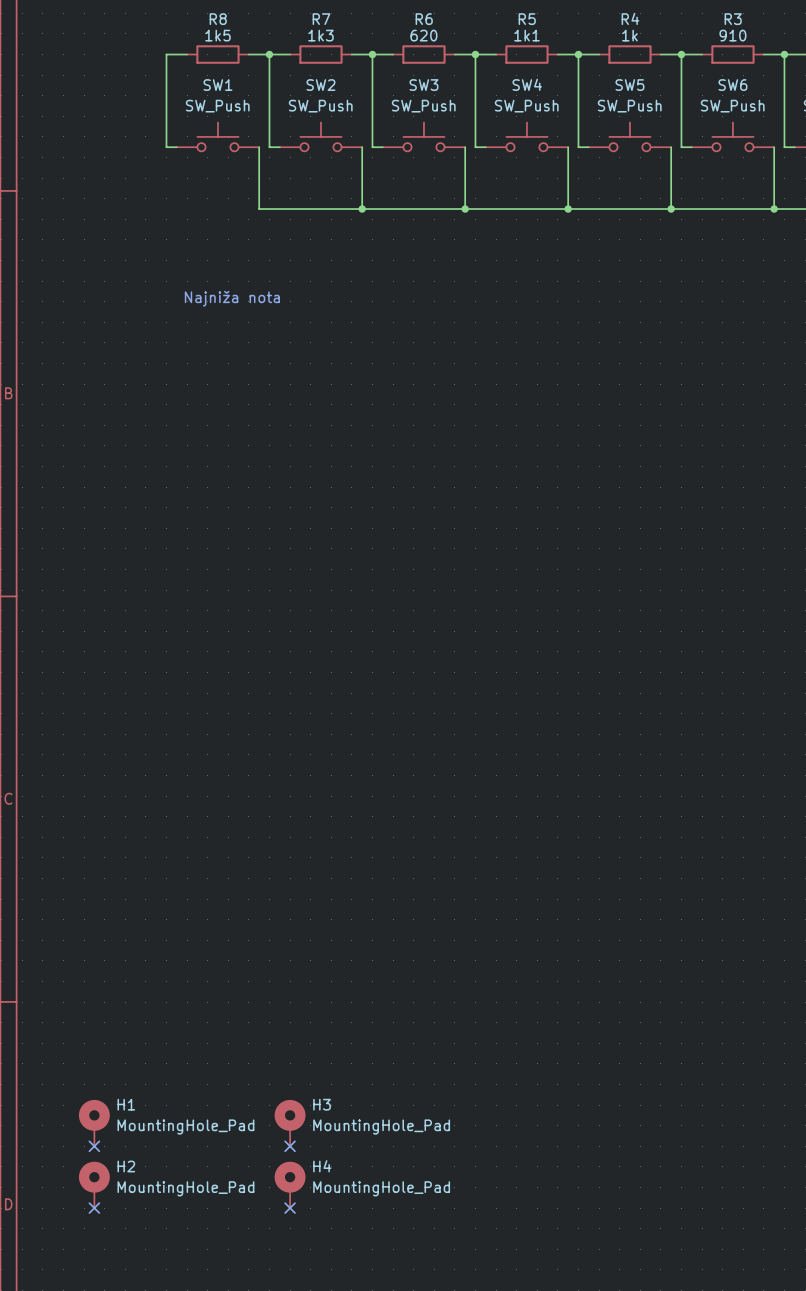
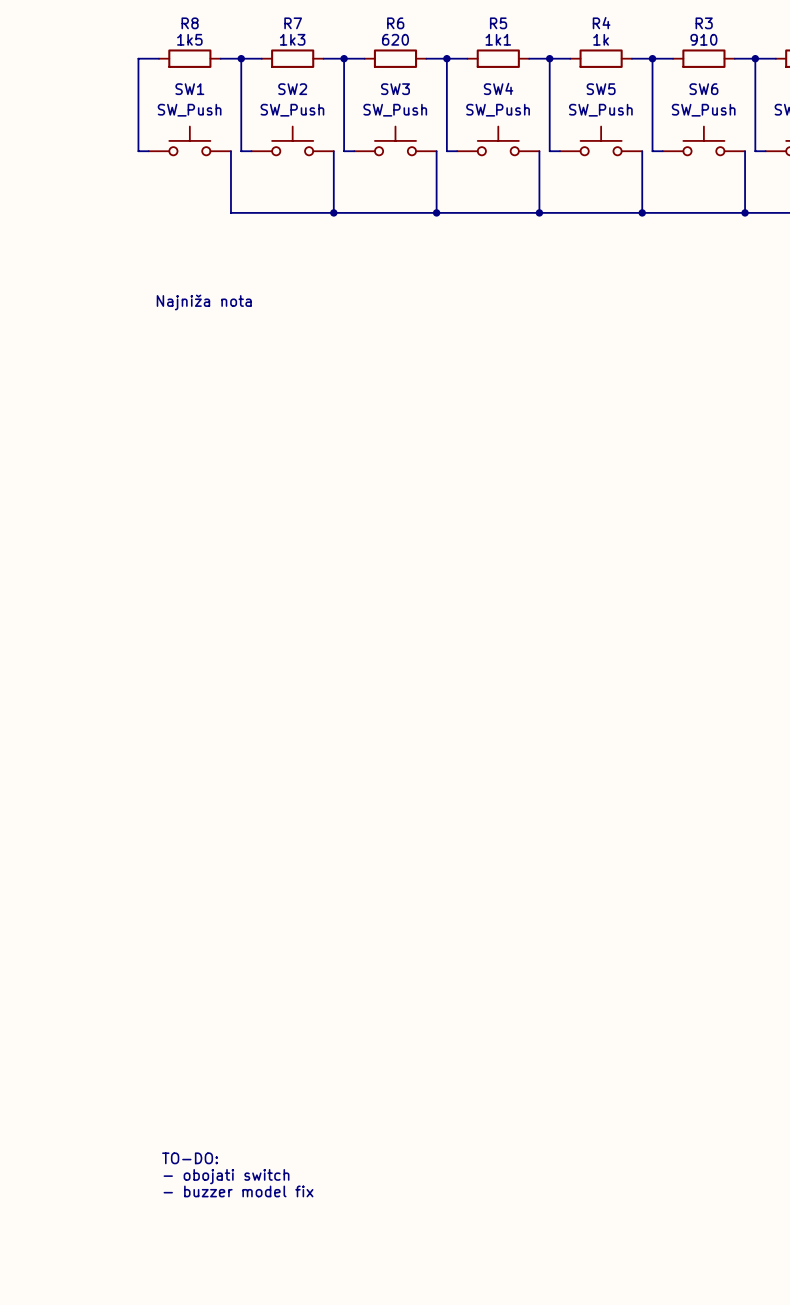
H1: MountingHole_Pad (94, 1123) -> none
H3: MountingHole_Pad (290, 1123) -> none
no-connect mark: (94, 1146) -> none
no-connect mark: (290, 1146) -> none
text: none -> TO-DO: (190, 1158)
text: none -> - obojati switch (226, 1176)
H2: MountingHole_Pad (94, 1184) -> none
H4: MountingHole_Pad (290, 1184) -> none
text: none -> - buzzer model fix (238, 1191)
no-connect mark: (94, 1208) -> none
no-connect mark: (290, 1208) -> none

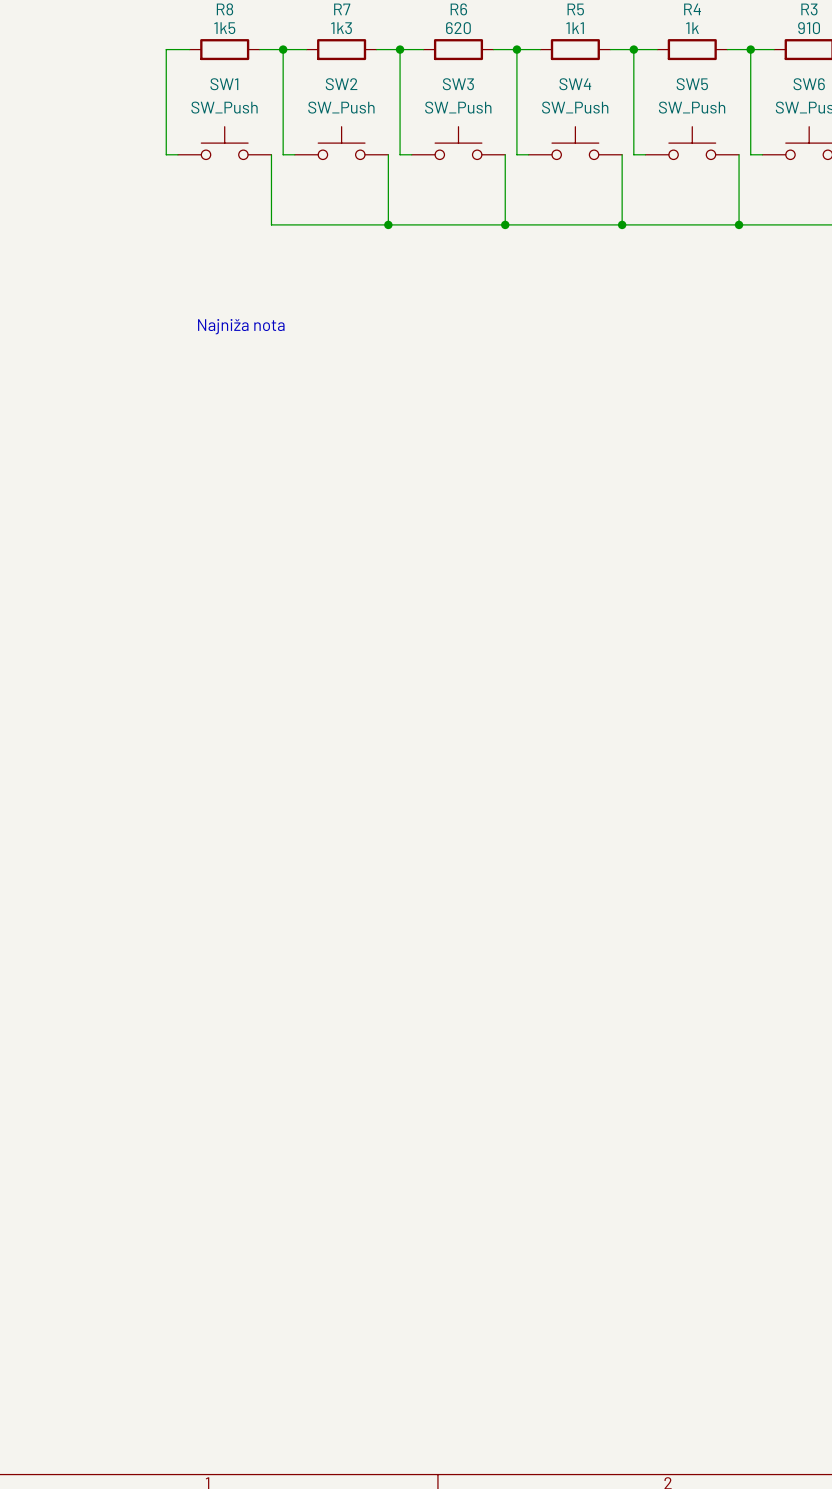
text: TO-DO: (190, 1158) -> none
text: - obojati switch (226, 1176) -> none
text: - buzzer model fix (238, 1191) -> none

